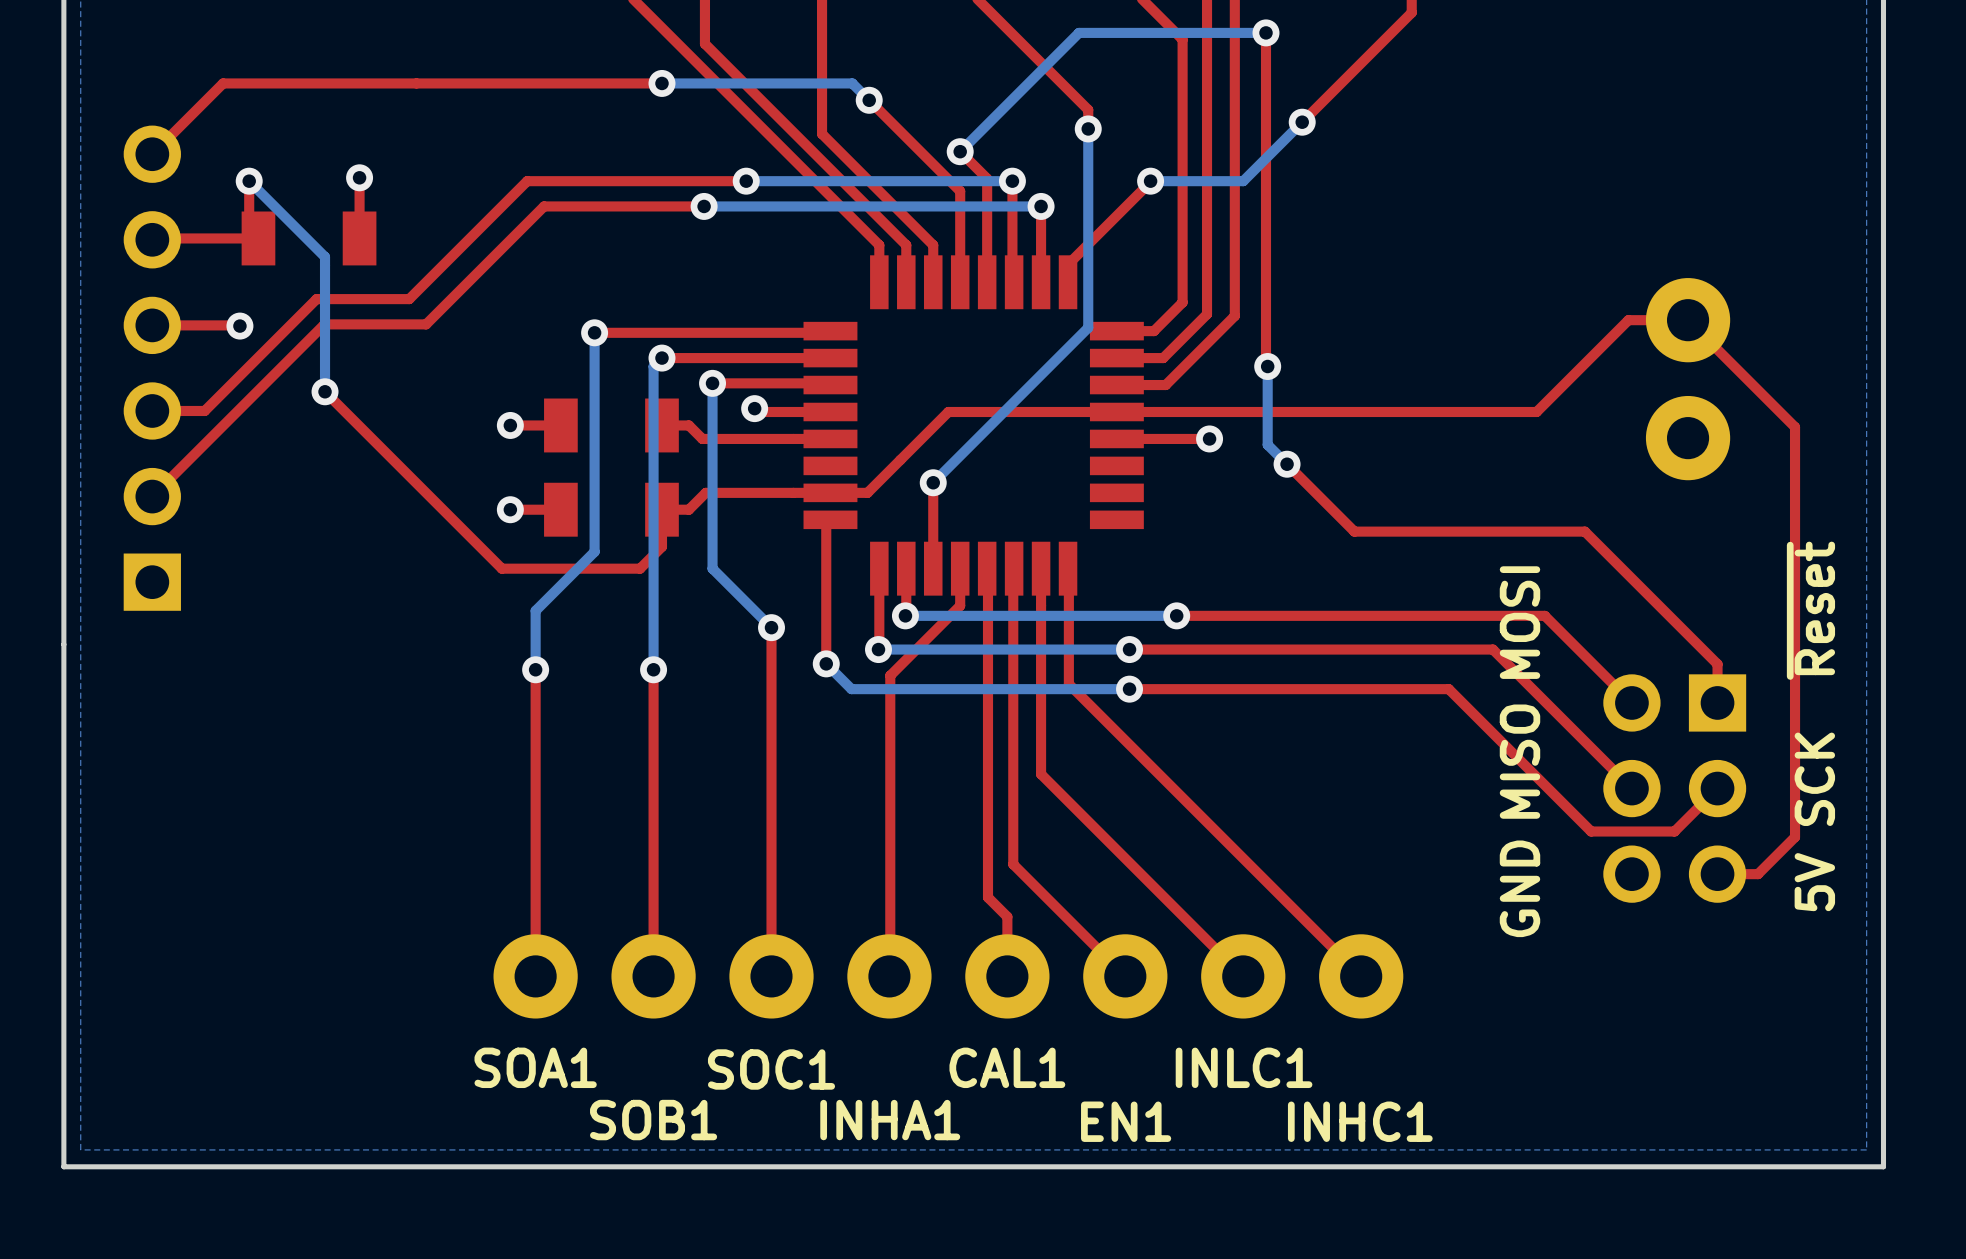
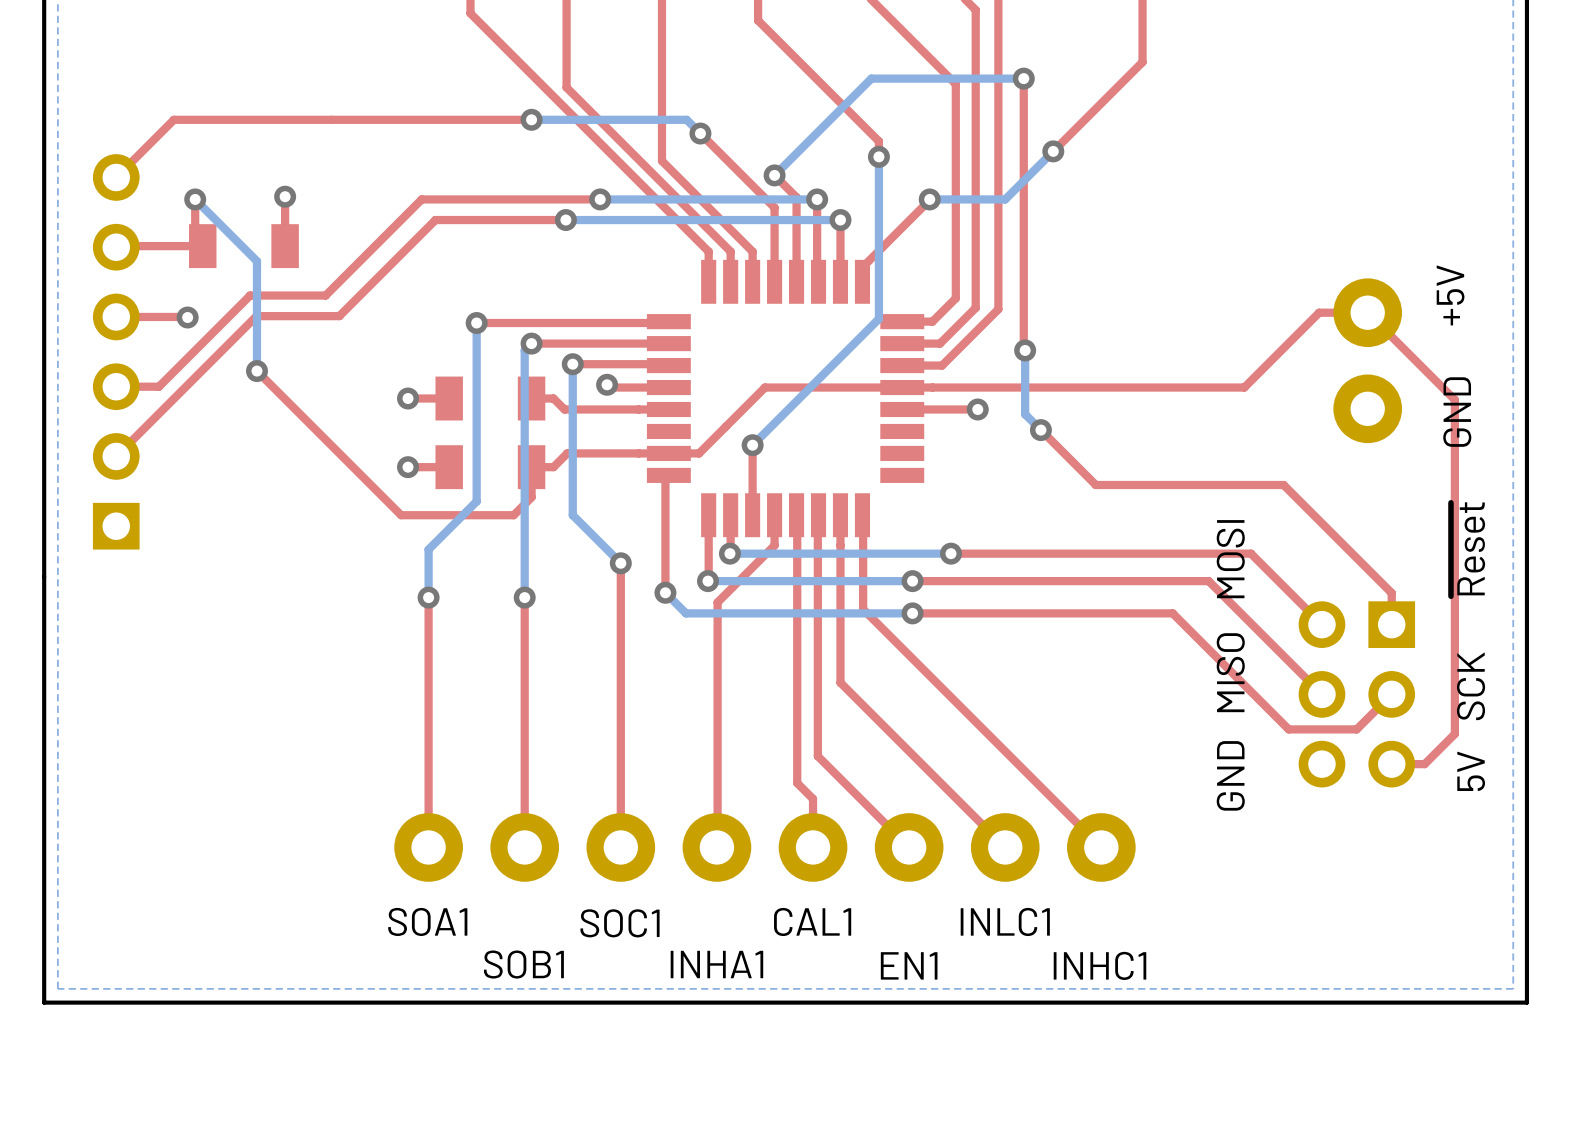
text: none -> +5V (1450, 295)
text: none -> GND (1457, 412)

